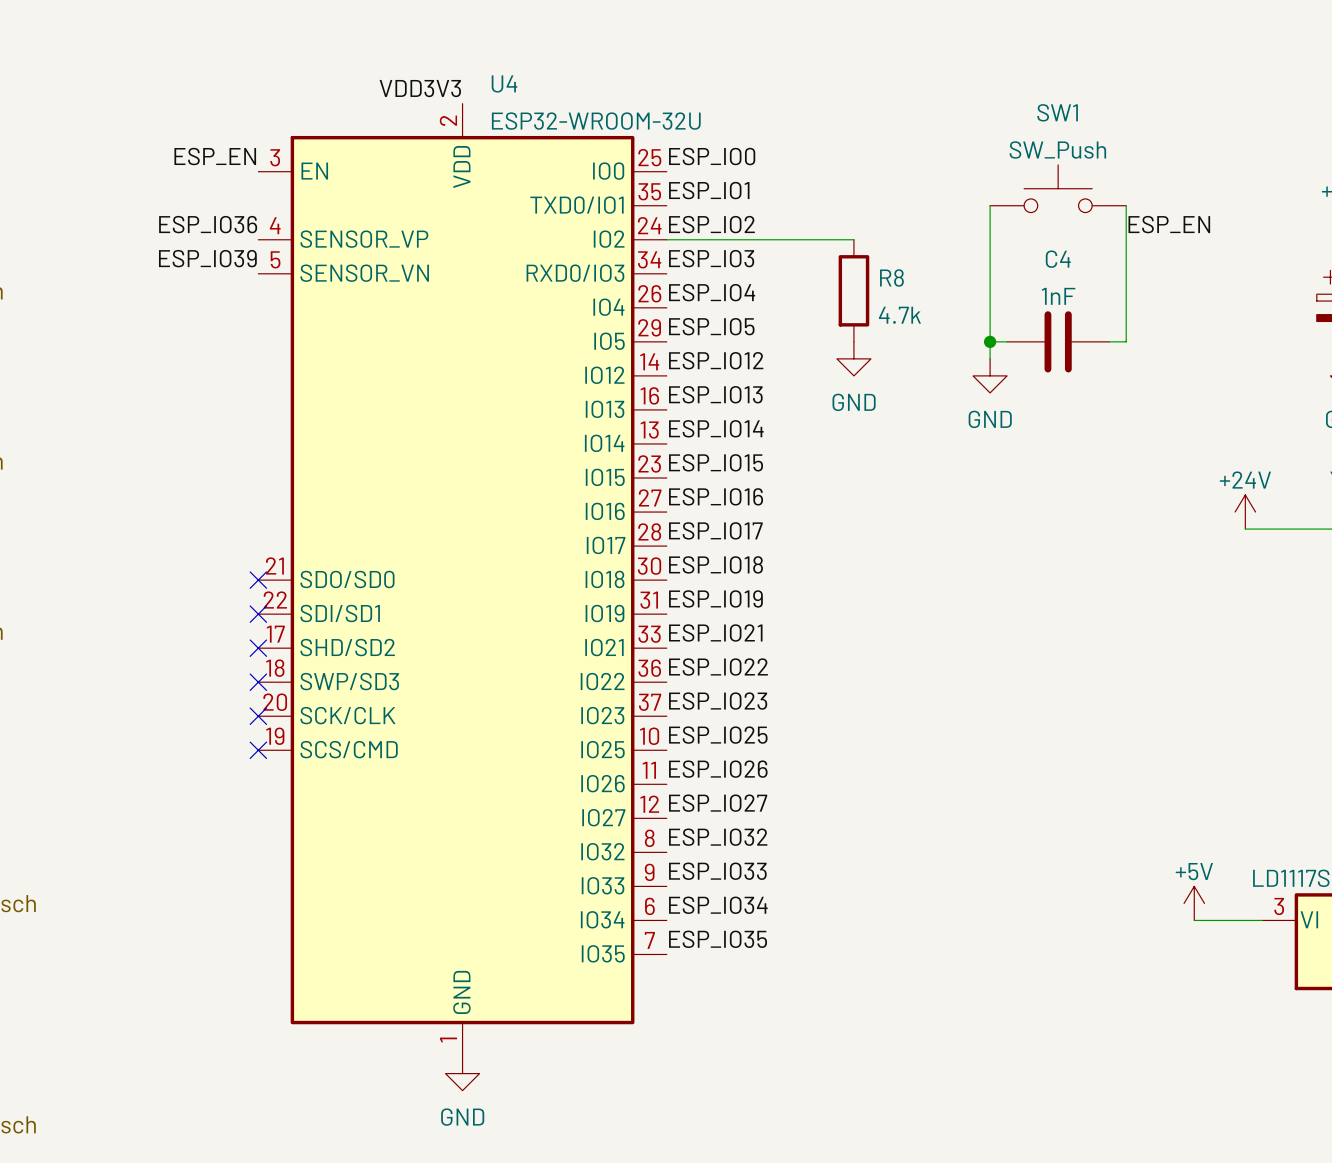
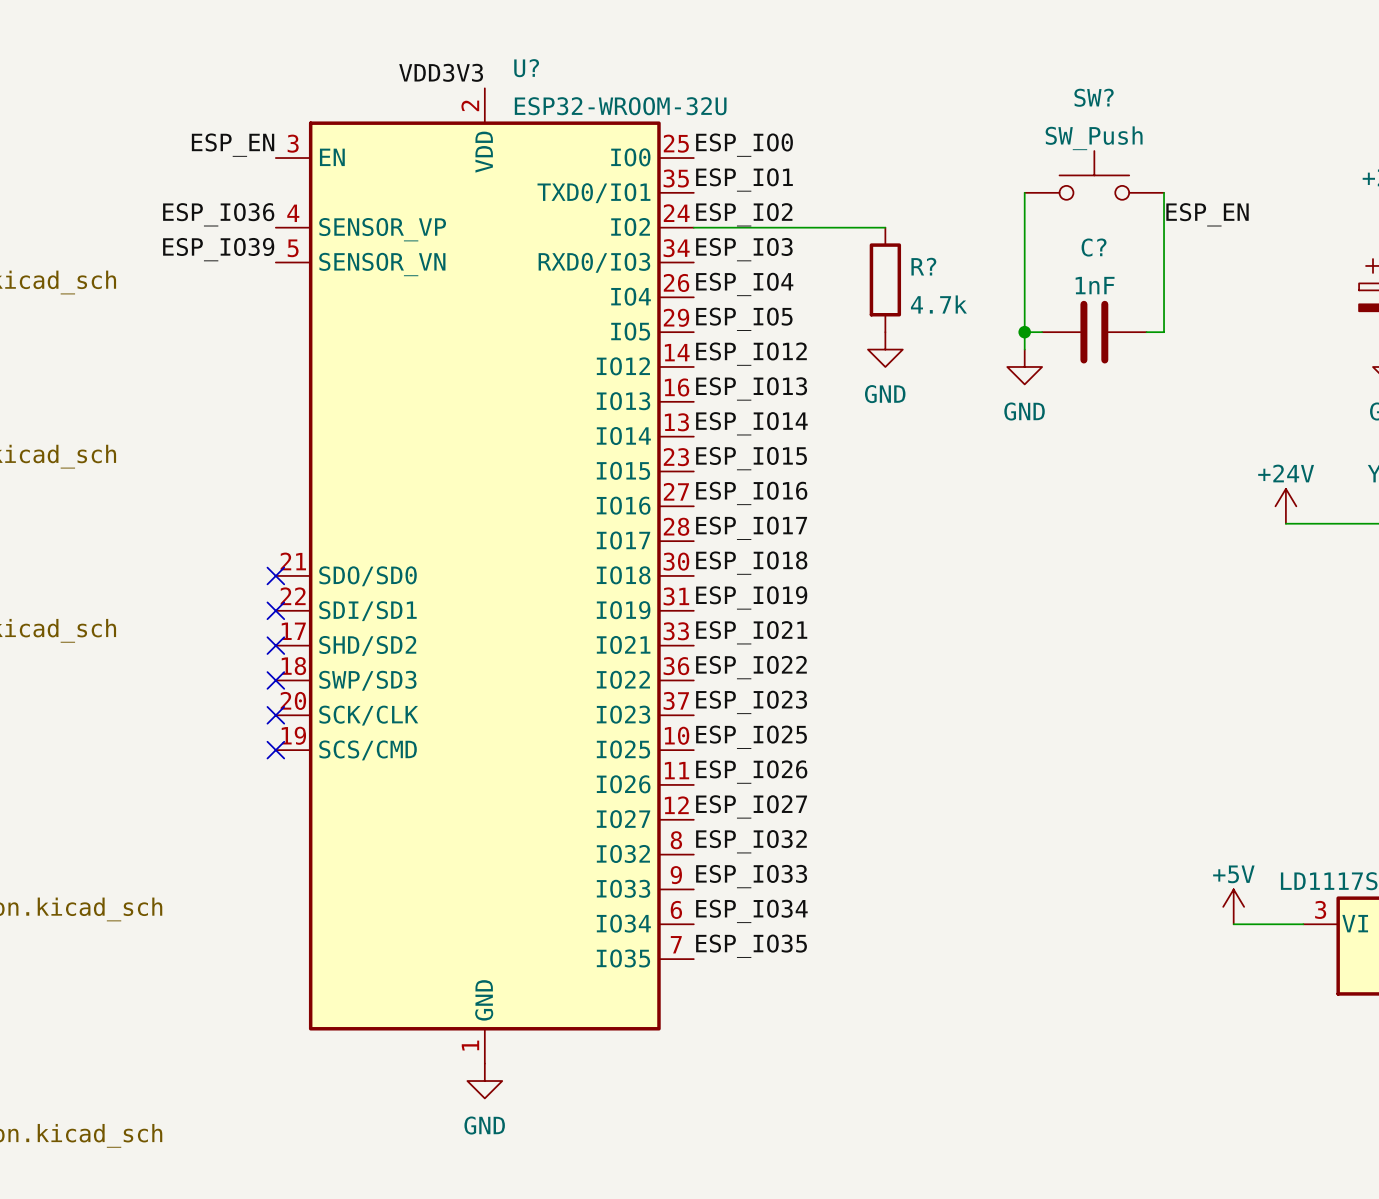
U4 name: U4 (504, 83) -> U? (526, 68)
SW1 name: SW1 (1057, 112) -> SW? (1094, 97)
C4 name: C4 (1058, 259) -> C? (1094, 247)
R8 name: R8 (891, 277) -> R? (923, 266)

